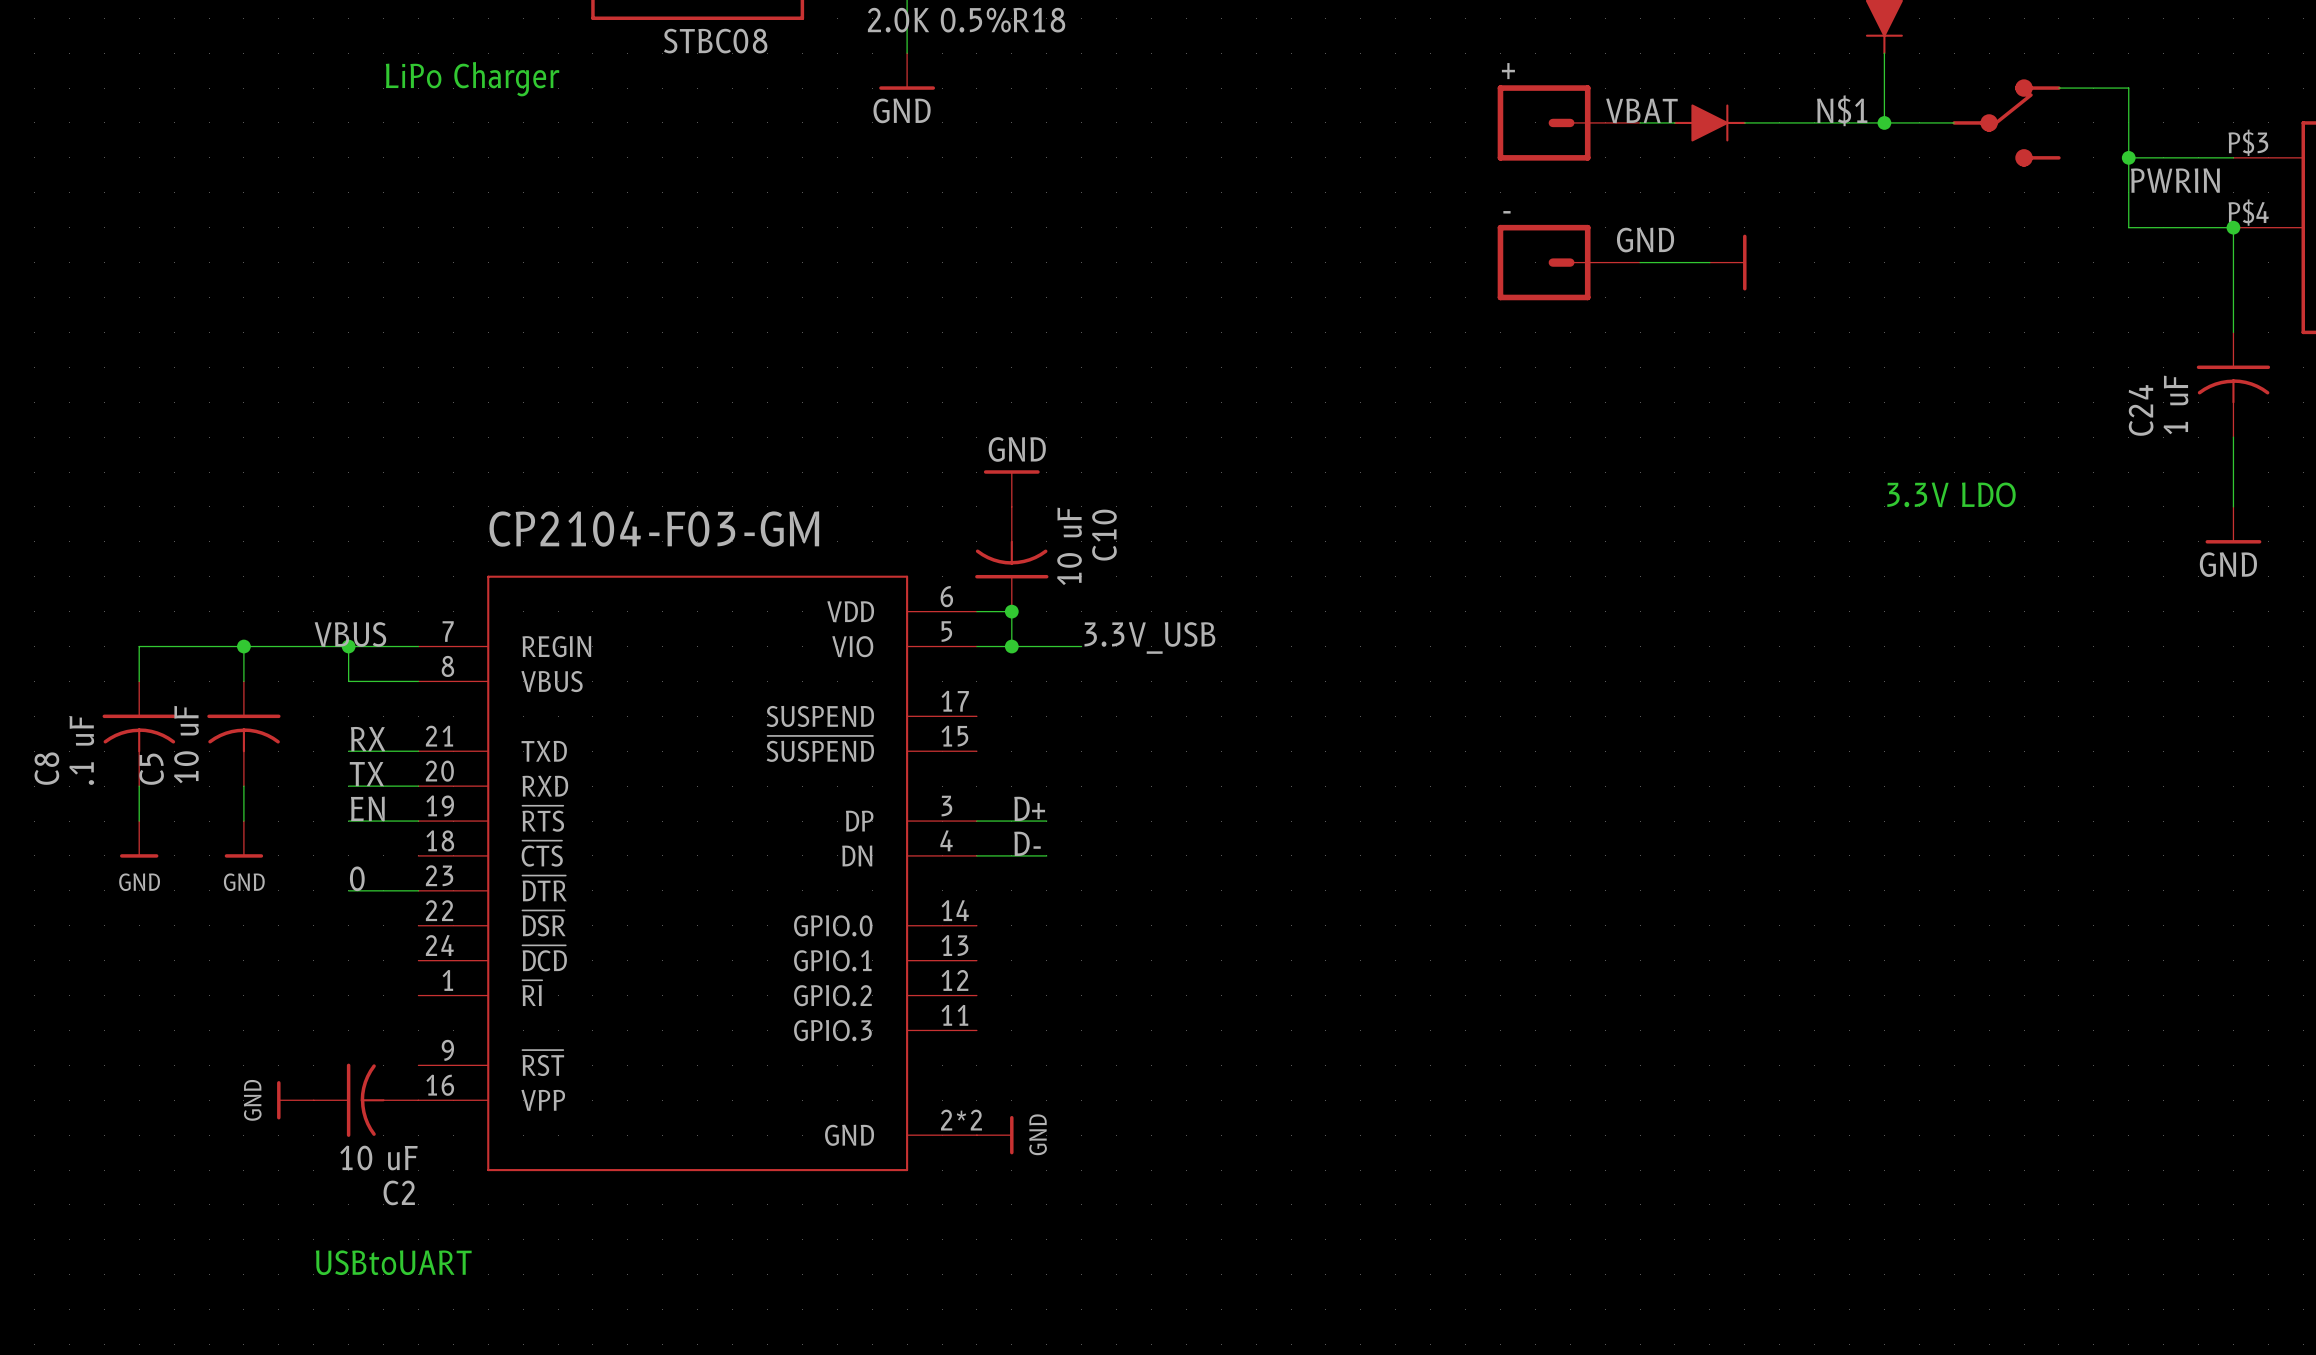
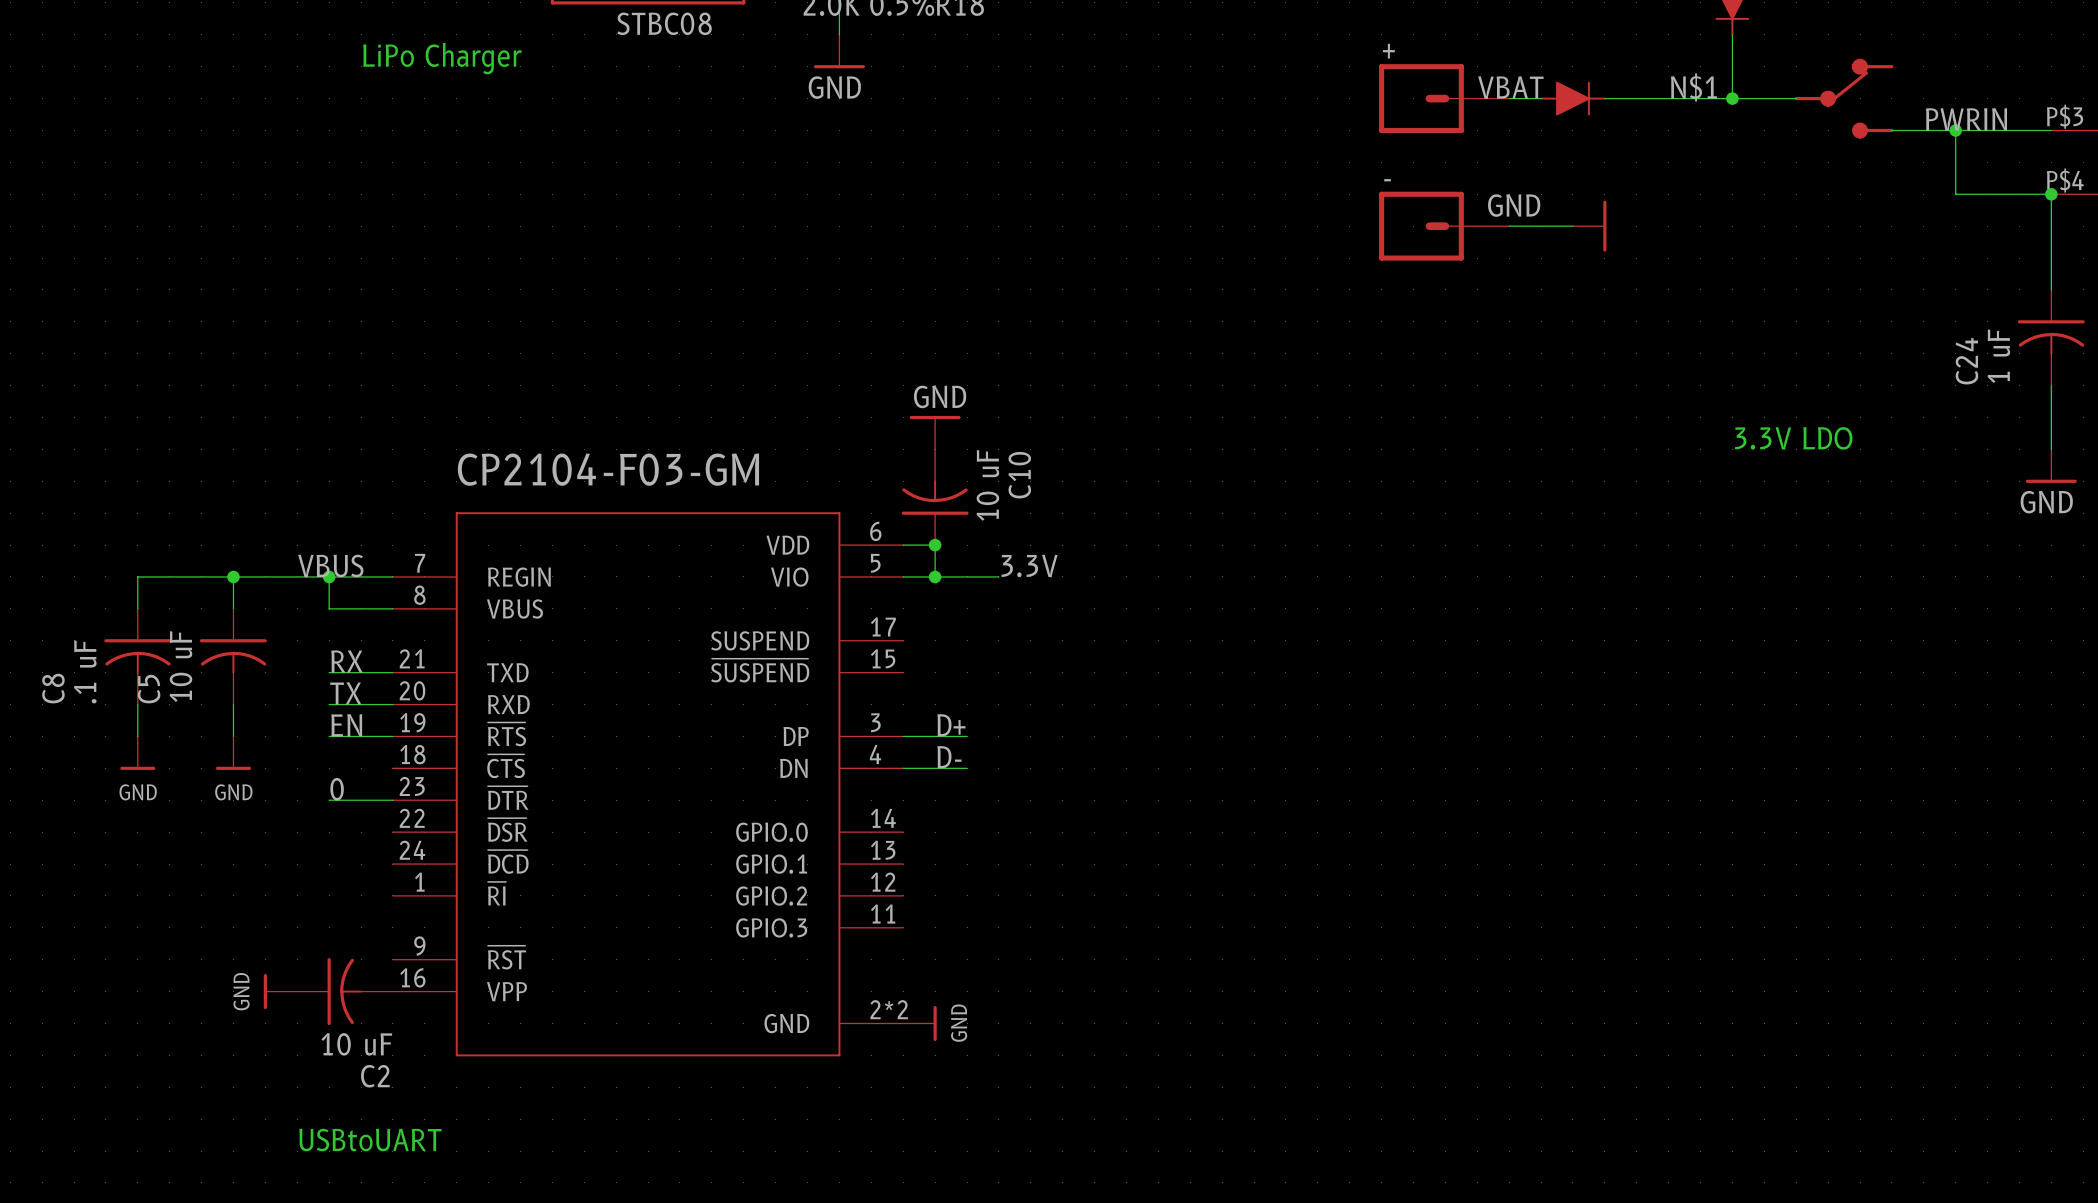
wire: (2058, 88) (2128, 88) (2128, 157) -> (1891, 130) (1955, 130)
label position: PWRIN (2175, 180) -> PWRIN (1966, 119)
label: 3.3V_USB (1149, 637) -> 3.3V (1029, 565)

